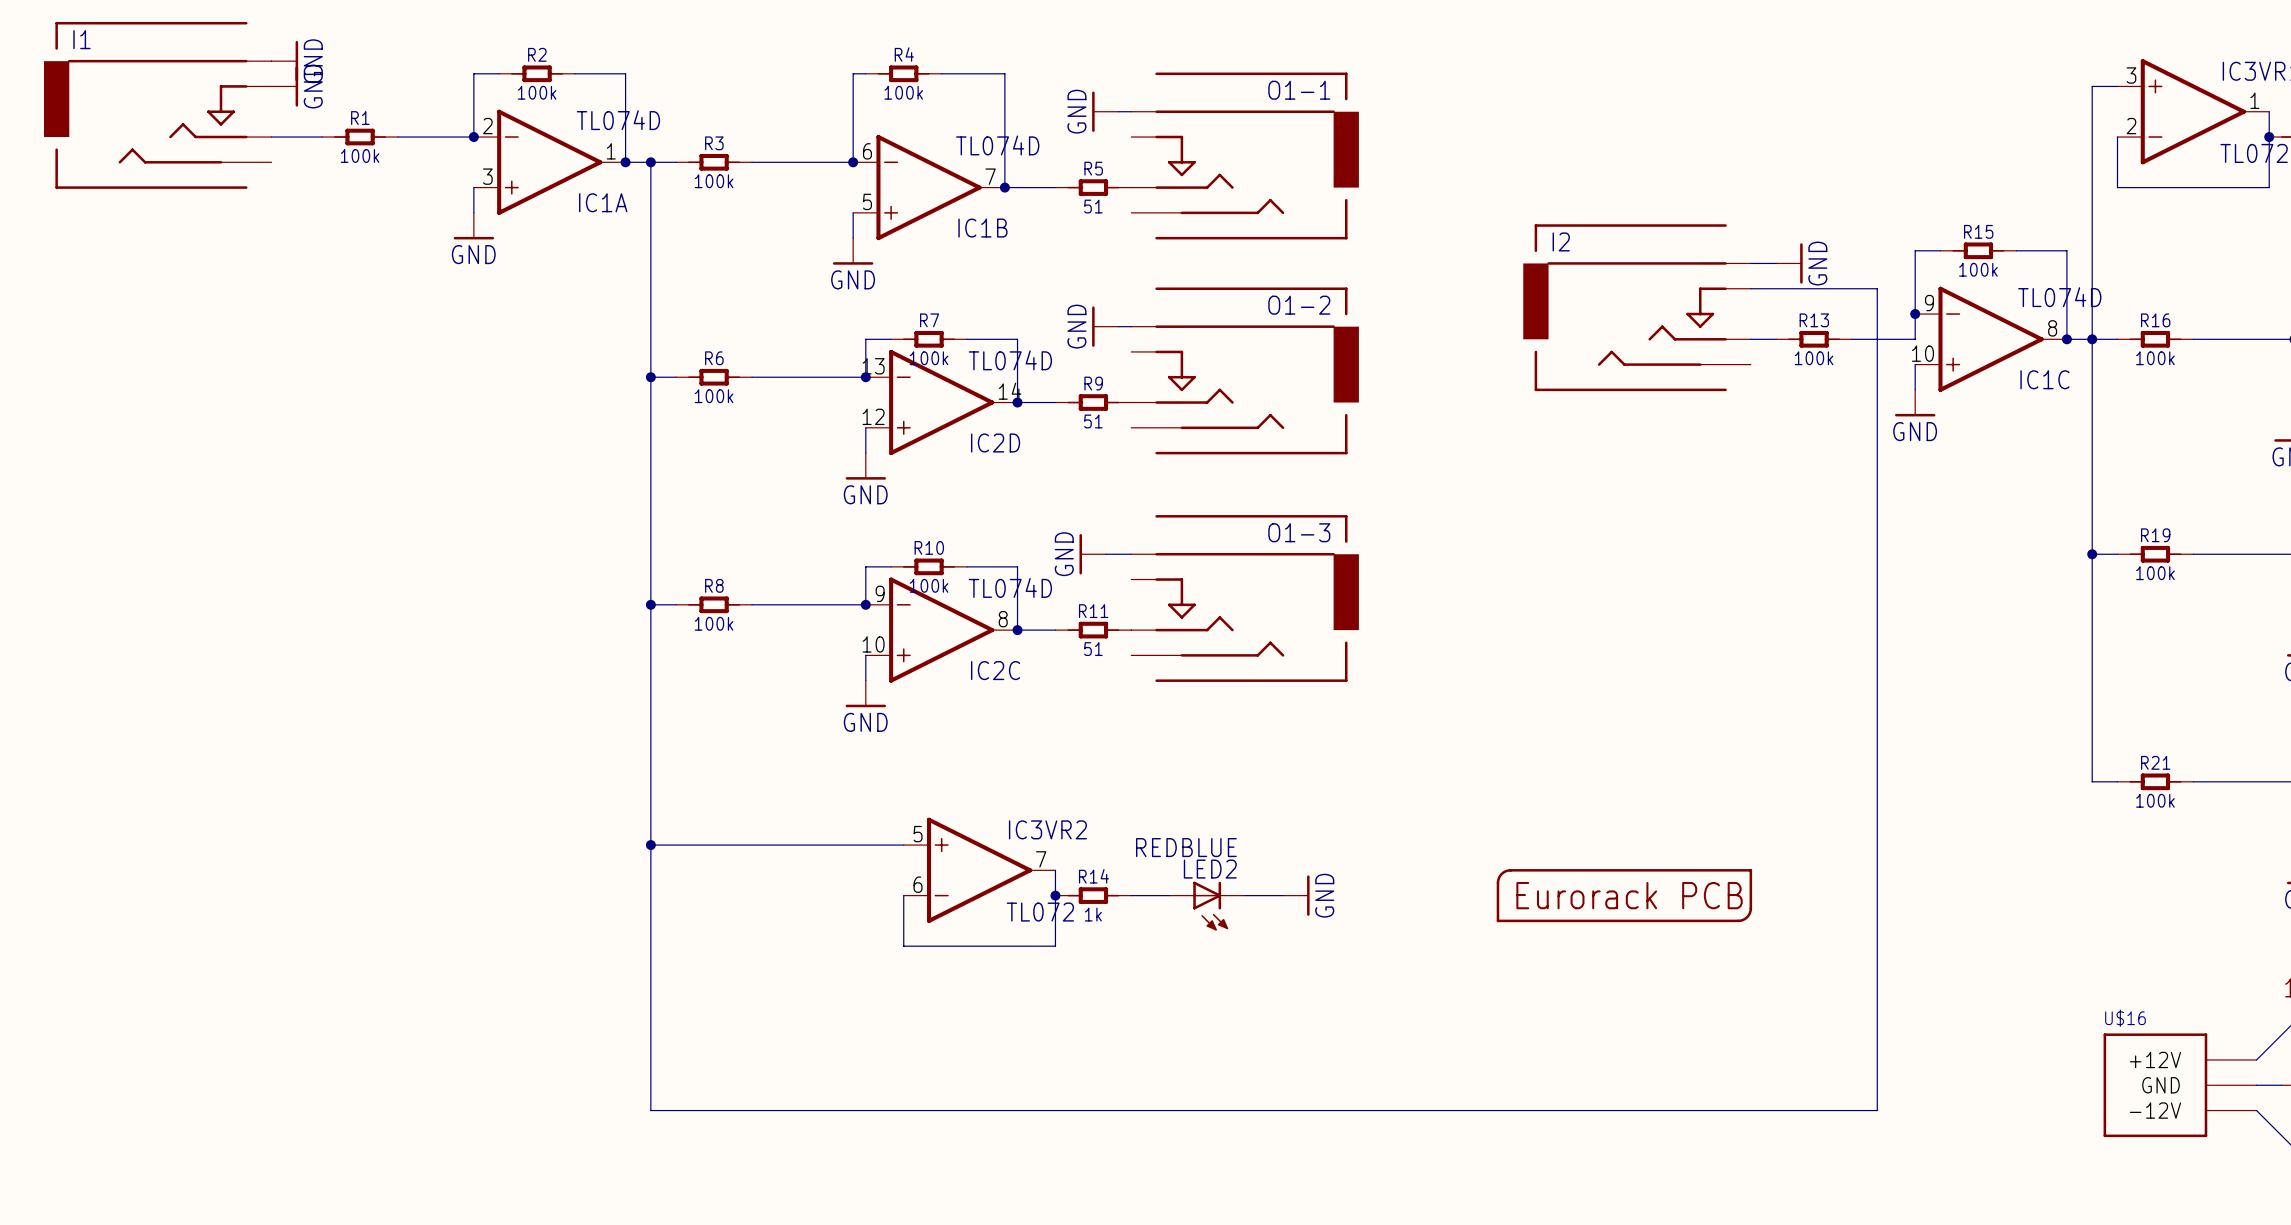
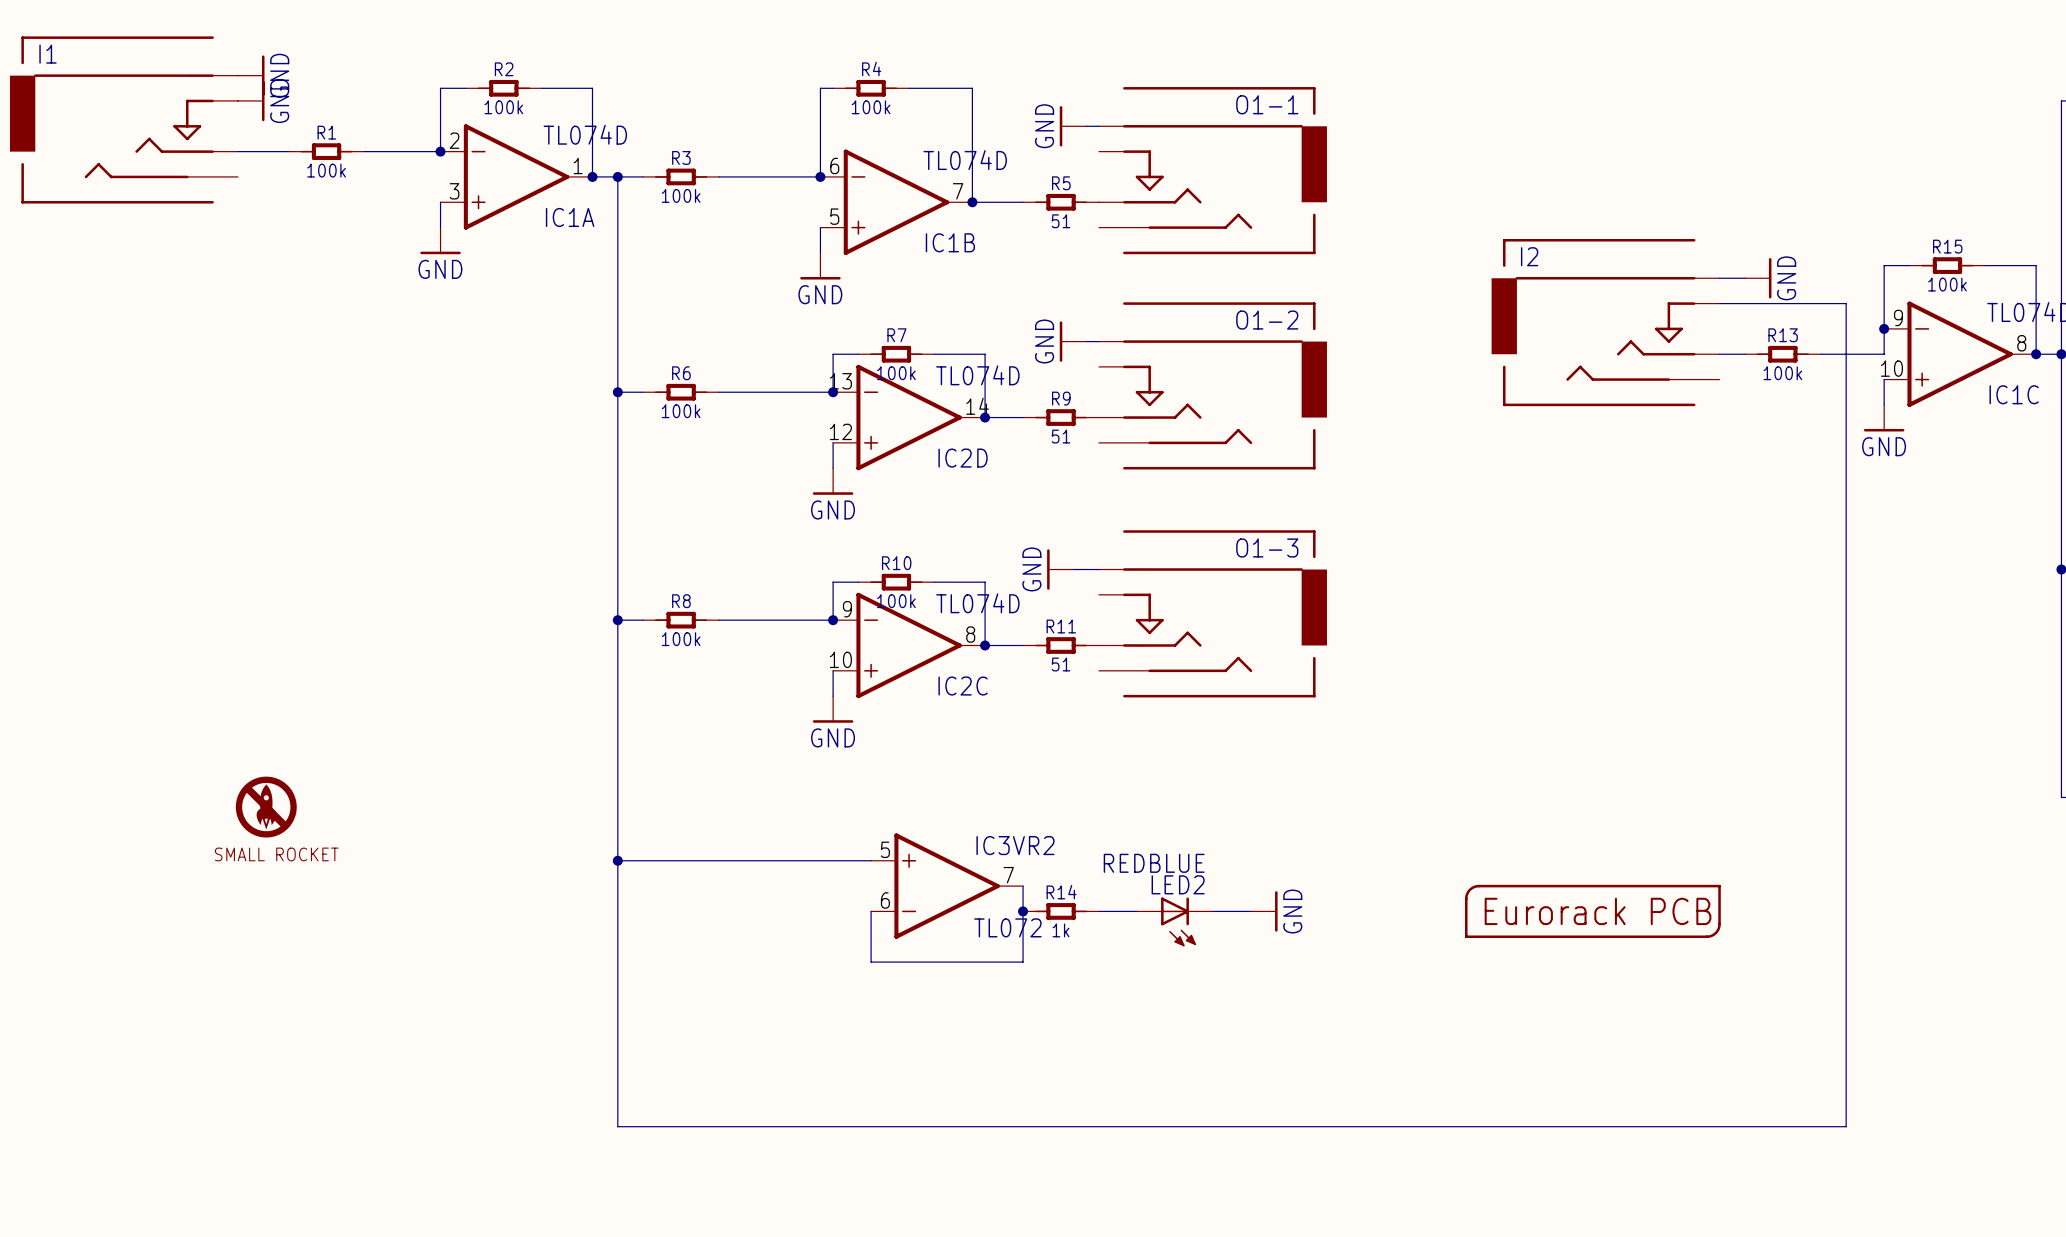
part: none -> (266, 807)

